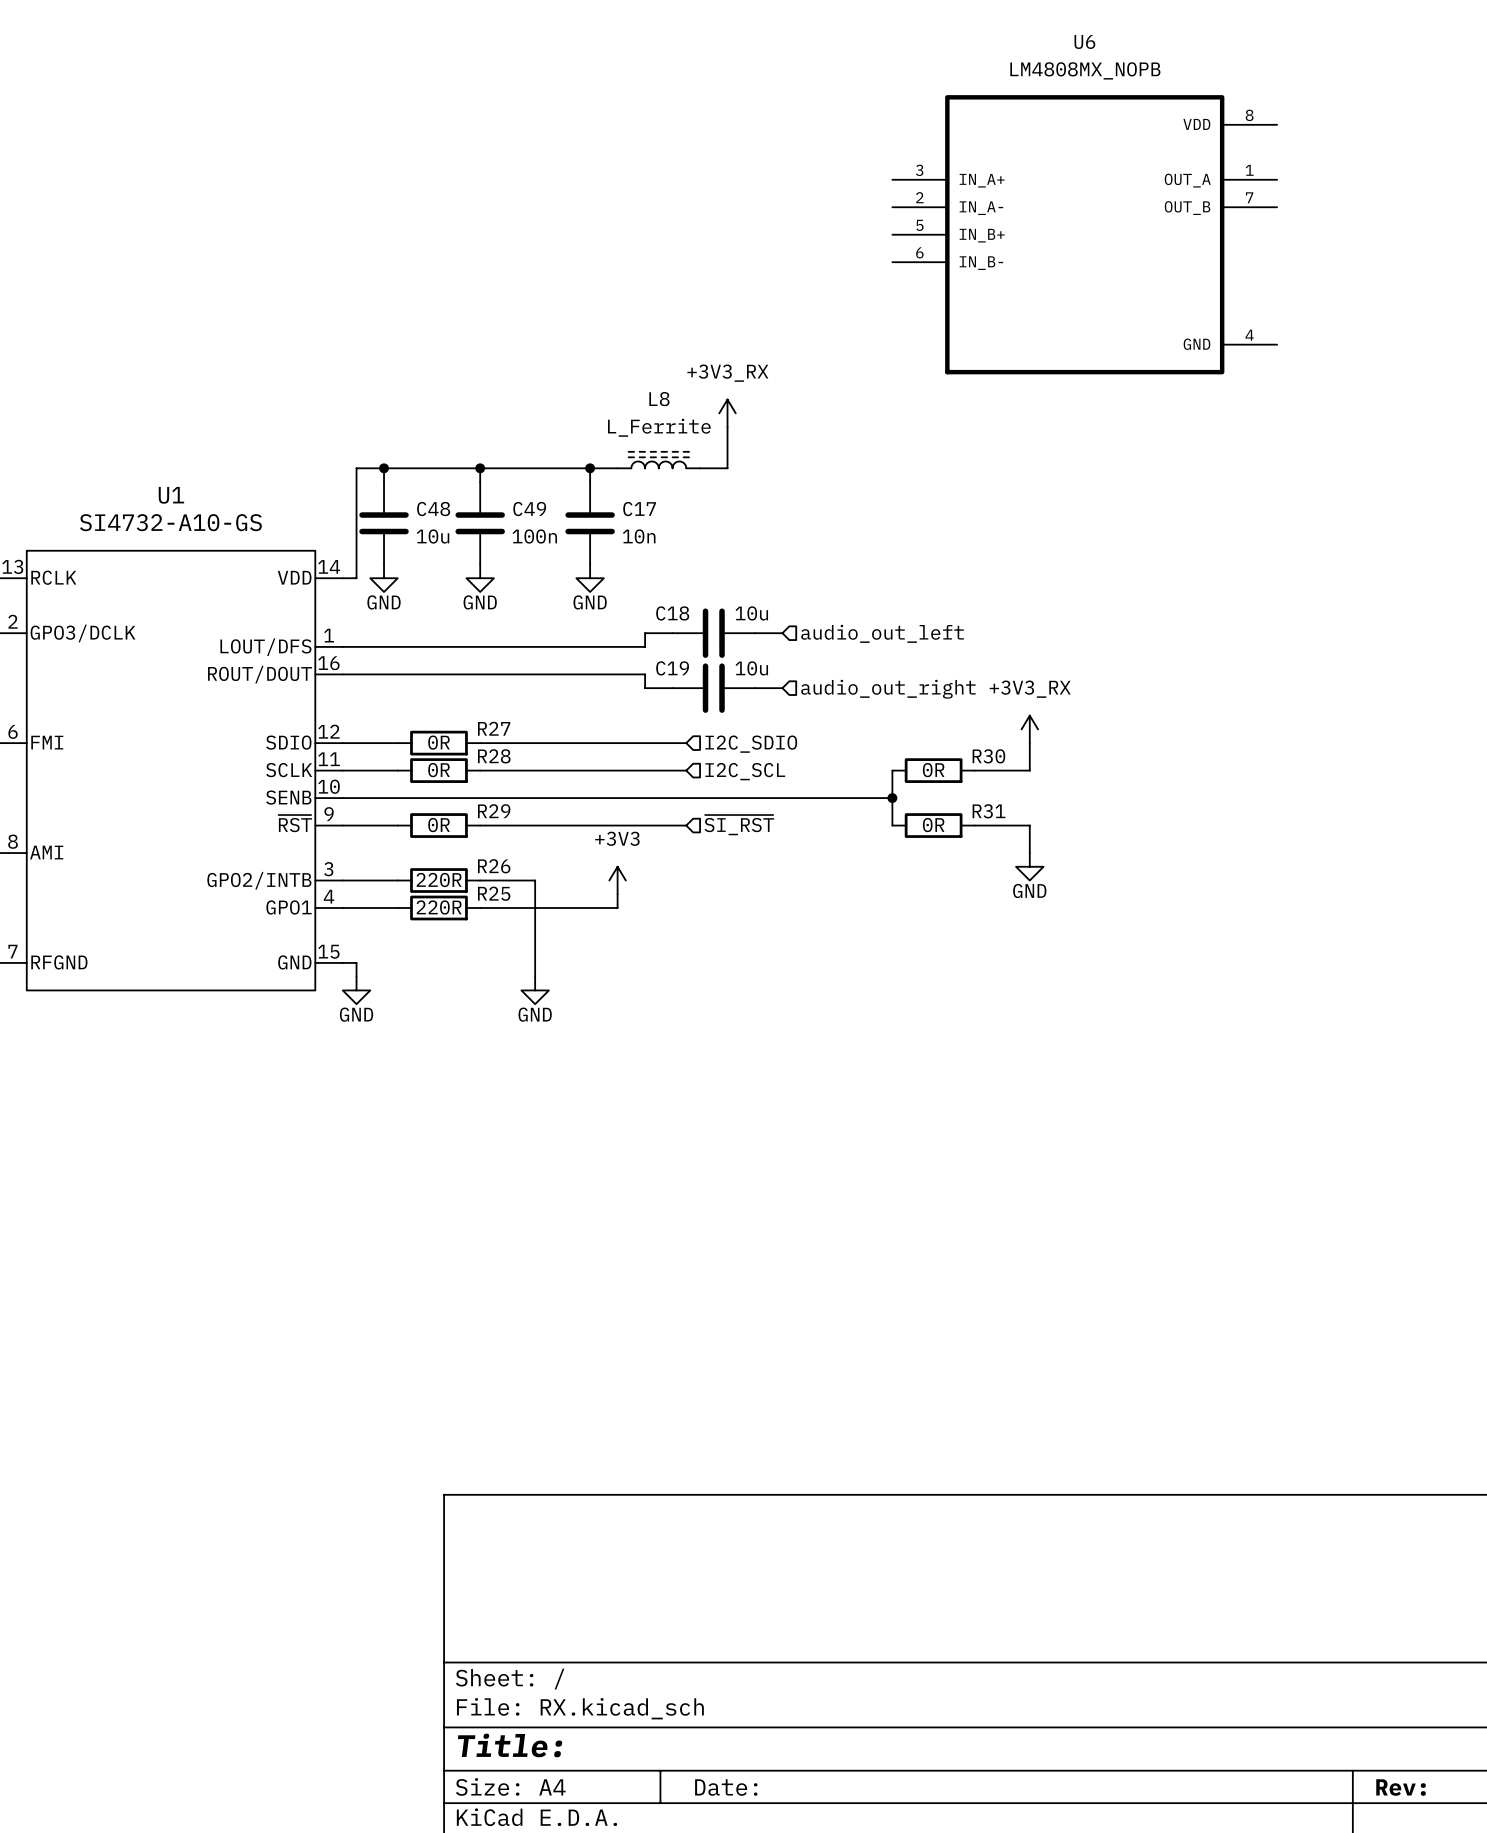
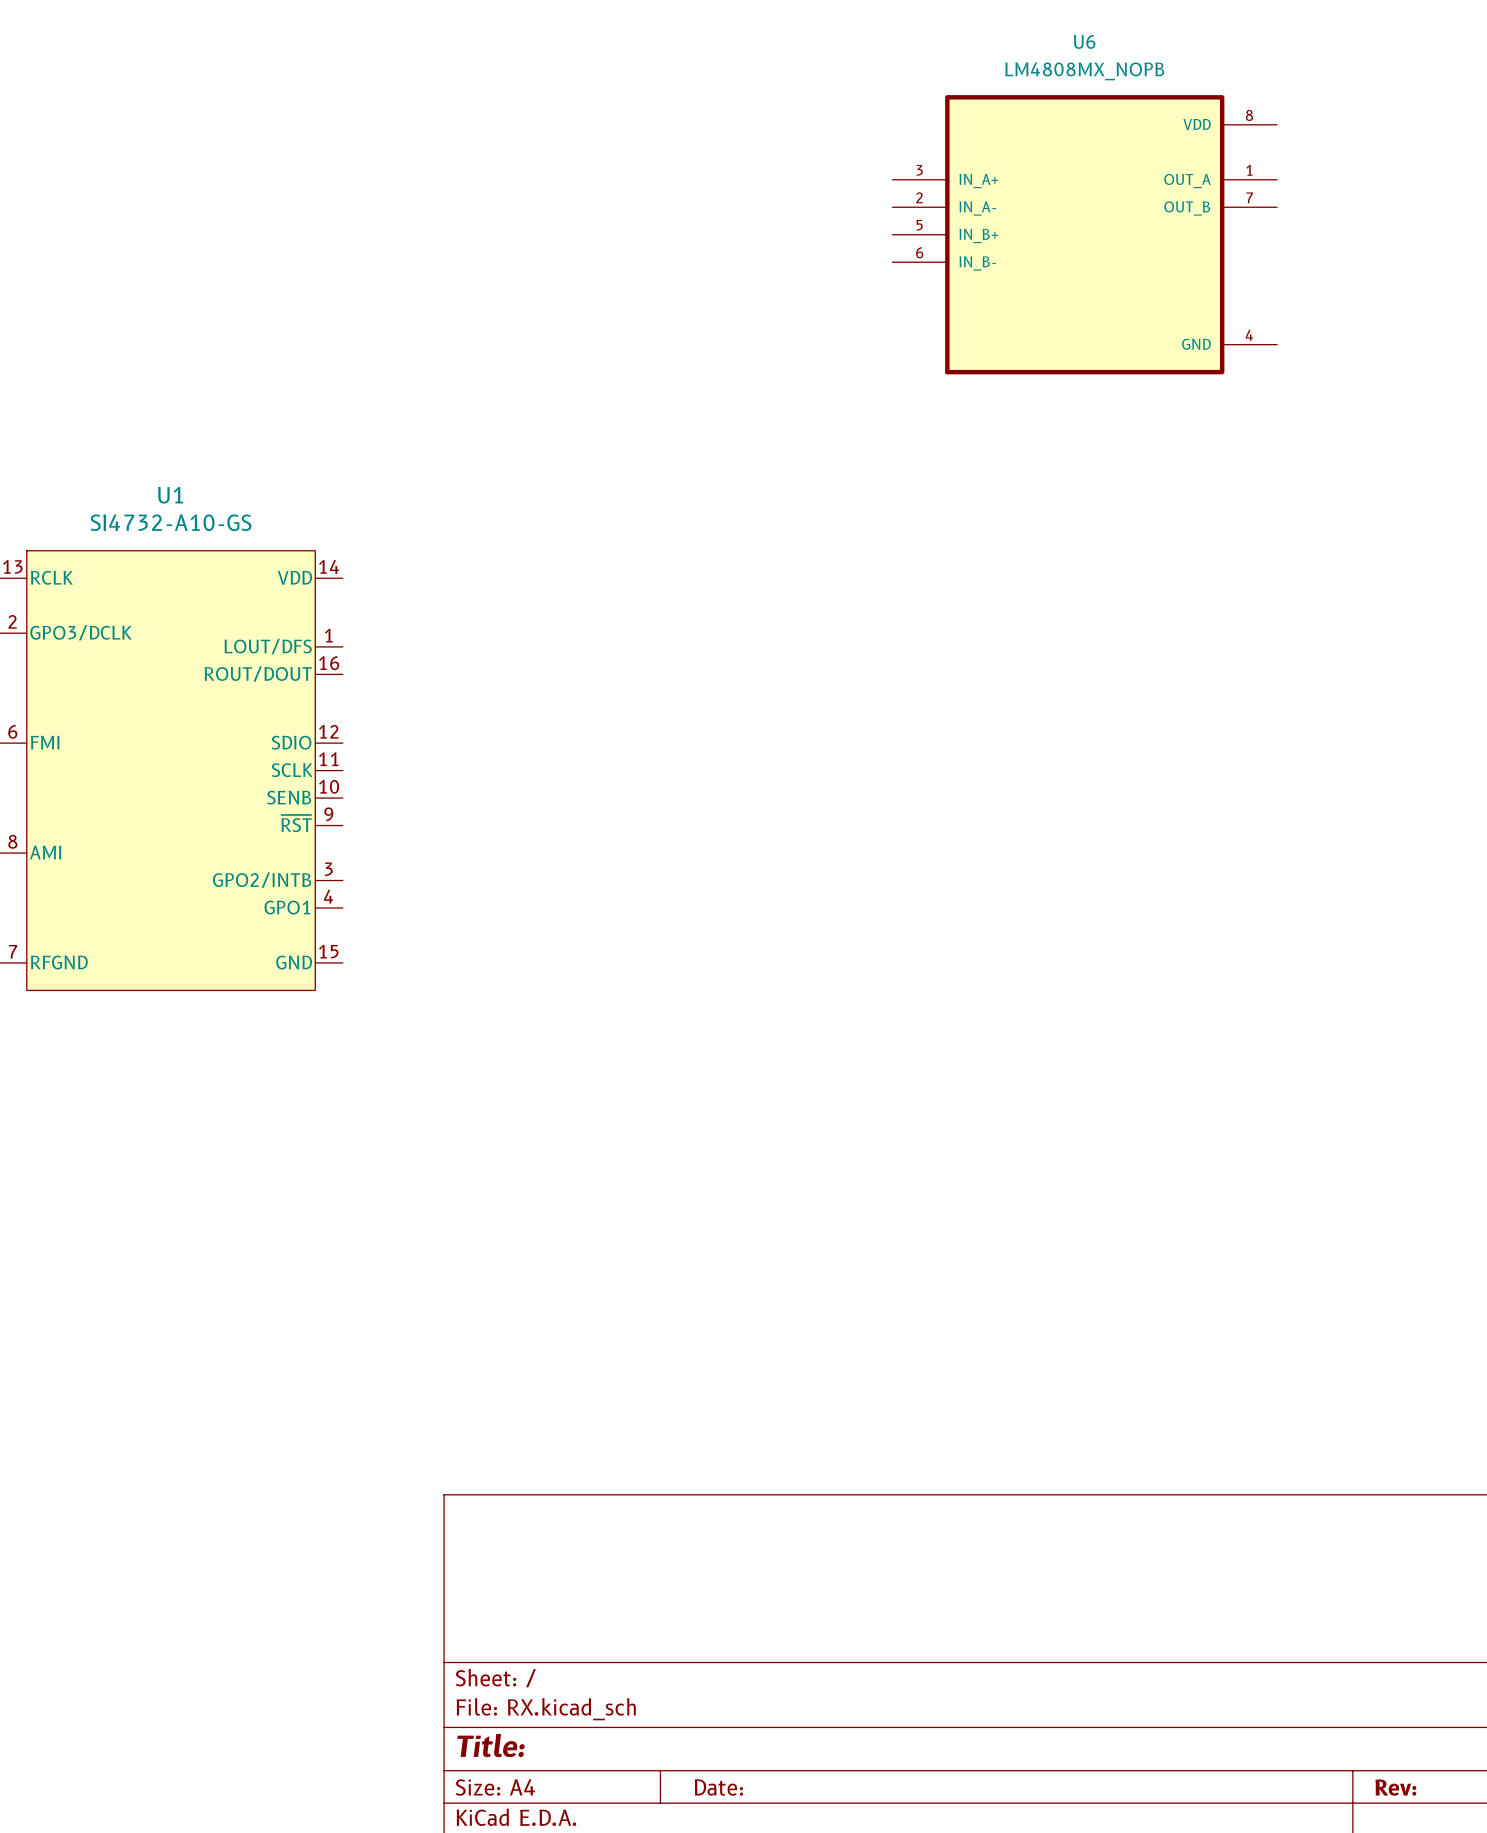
power symbol: +3V3_RX (727, 413) -> none
wire: (727, 427) (727, 468) (700, 468) -> none
L8: L_Ferrite (658, 460) -> none
wire: (384, 468) (384, 482) -> none
junction: (384, 468) -> none
wire: (480, 468) (480, 482) -> none
junction: (480, 468) -> none
wire: (590, 468) (590, 482) -> none
junction: (590, 468) -> none
wire: (617, 468) (356, 468) (356, 578) (342, 578) -> none
C48: 10u (384, 523) -> none
C49: 100n (480, 523) -> none
C17: 10n (590, 523) -> none
power symbol: GND (384, 578) -> none
power symbol: GND (480, 578) -> none
power symbol: GND (590, 578) -> none
wire: (672, 633) (645, 633) (645, 646) (342, 646) -> none
C18: 10u (713, 633) -> none
wire: (754, 633) (782, 633) -> none
hierarchical label: audio_out_left (882, 633) -> none
wire: (342, 674) (645, 674) (645, 688) (672, 688) -> none
C19: 10u (713, 688) -> none
wire: (754, 688) (782, 688) -> none
hierarchical label: audio_out_right (888, 689) -> none
power symbol: +3V3_RX (1029, 729) -> none
wire: (342, 743) (397, 743) -> none
R27: 0R (438, 743) -> none
wire: (480, 743) (686, 743) -> none
wire: (1029, 743) (1029, 770) (974, 770) -> none
hierarchical label: I2C_SDIO (751, 744) -> none
wire: (342, 770) (397, 770) -> none
R28: 0R (438, 770) -> none
wire: (480, 770) (686, 770) -> none
wire: (892, 770) (892, 825) -> none
R30: 0R (933, 770) -> none
hierarchical label: I2C_SCL (745, 771) -> none
wire: (342, 798) (892, 798) -> none
junction: (892, 798) -> none
wire: (342, 825) (397, 825) -> none
R29: 0R (438, 825) -> none
wire: (480, 825) (686, 825) -> none
hierarchical label: ~{SI_RST} (739, 825) -> none
R31: 0R (933, 825) -> none
wire: (974, 825) (1029, 825) (1029, 853) -> none
power symbol: GND (1029, 866) -> none
wire: (342, 880) (397, 880) -> none
R26: 220R (438, 880) -> none
wire: (480, 880) (535, 880) (535, 976) -> none
power symbol: +3V3 (617, 880) -> none
wire: (617, 894) (617, 907) (480, 907) -> none
wire: (342, 907) (397, 907) -> none
R25: 220R (438, 907) -> none
wire: (342, 962) (356, 962) (356, 976) -> none
power symbol: GND (356, 990) -> none
power symbol: GND (535, 990) -> none

